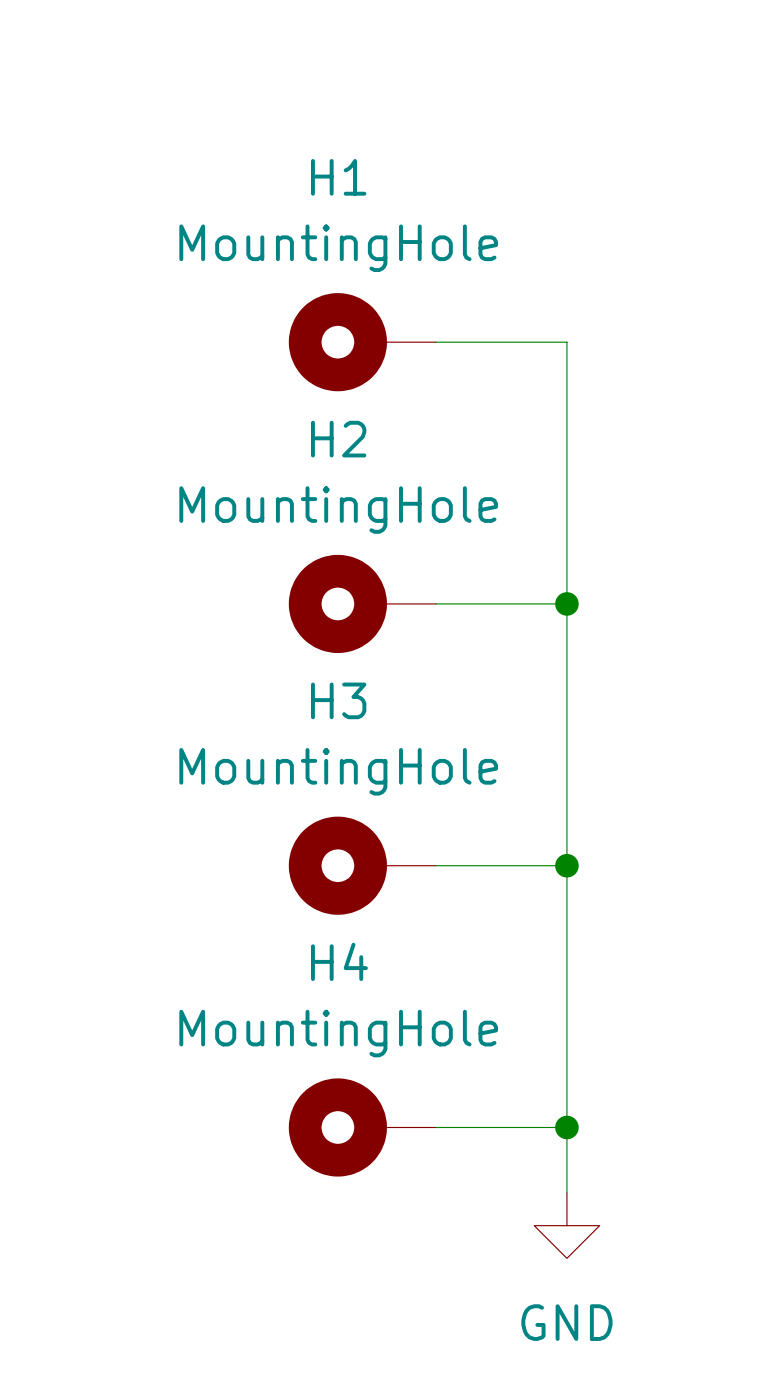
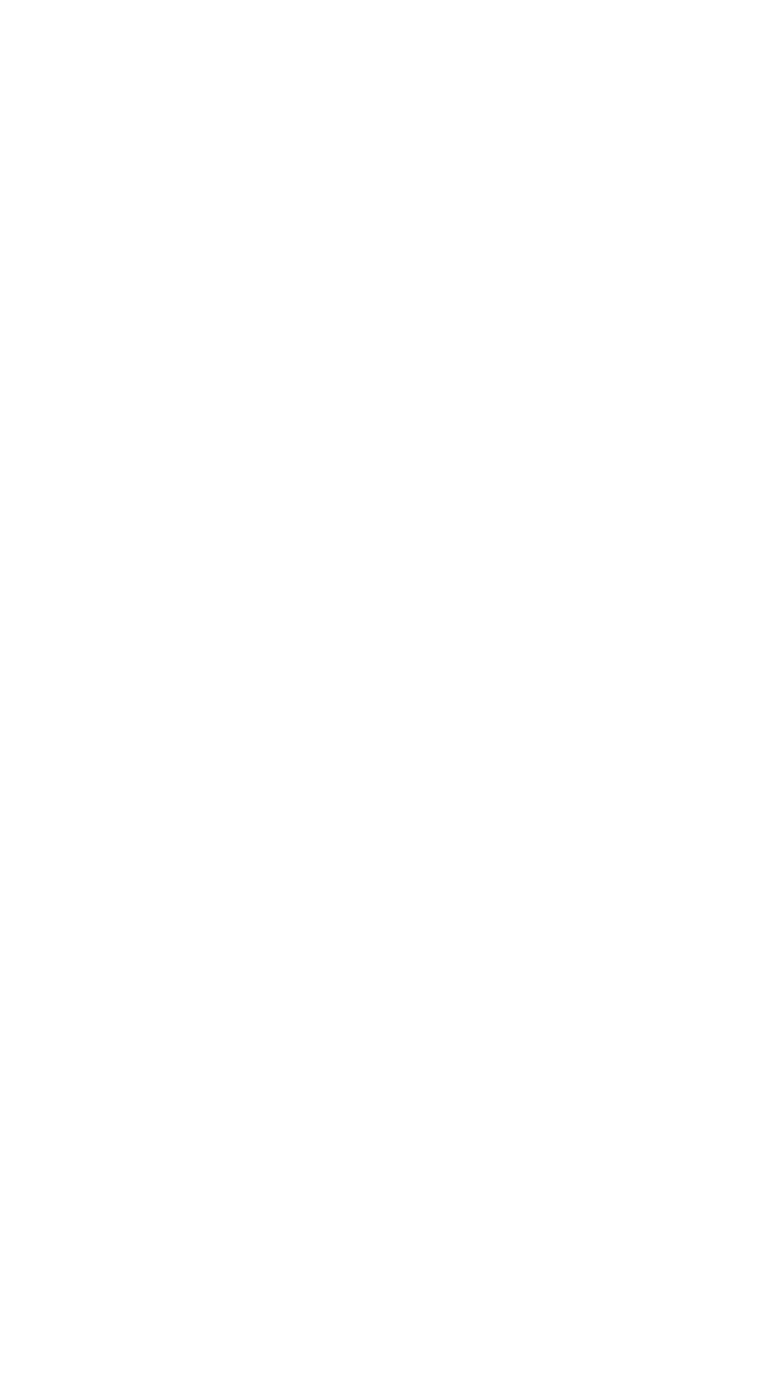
H1: MountingHole (362, 342) -> none
wire: (436, 342) (566, 342) (566, 1192) -> none
H2: MountingHole (362, 603) -> none
wire: (436, 603) (566, 603) -> none
junction: (566, 603) -> none
H3: MountingHole (362, 865) -> none
wire: (436, 865) (566, 865) -> none
junction: (566, 865) -> none
H4: MountingHole (362, 1127) -> none
wire: (436, 1127) (566, 1127) -> none
junction: (566, 1127) -> none
power symbol: GND (566, 1225) -> none

